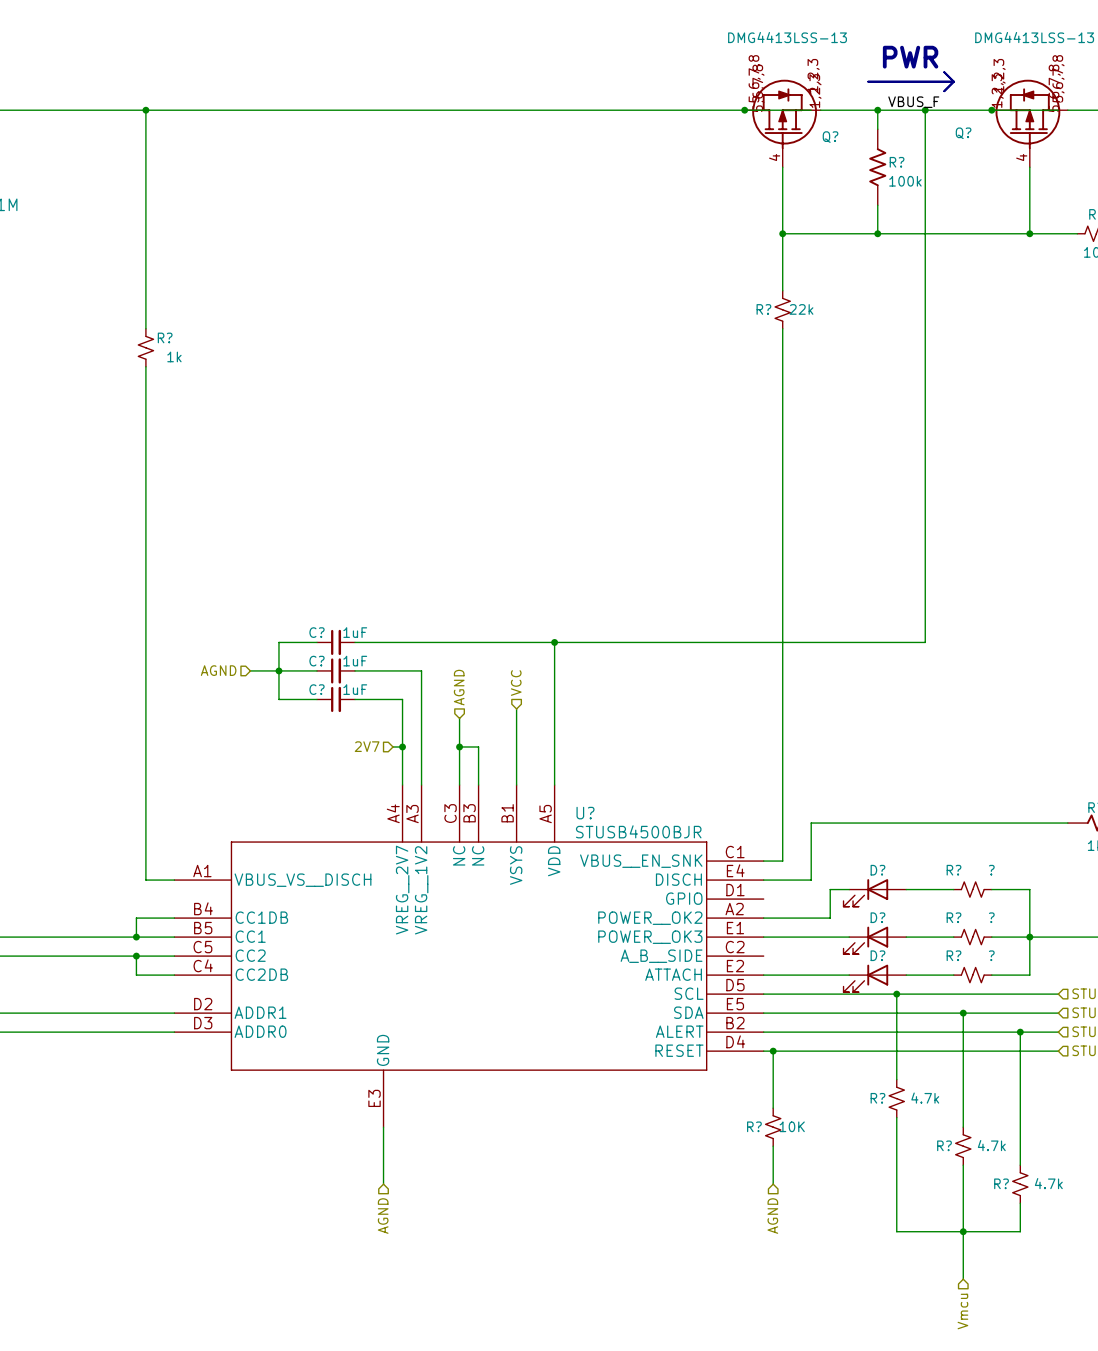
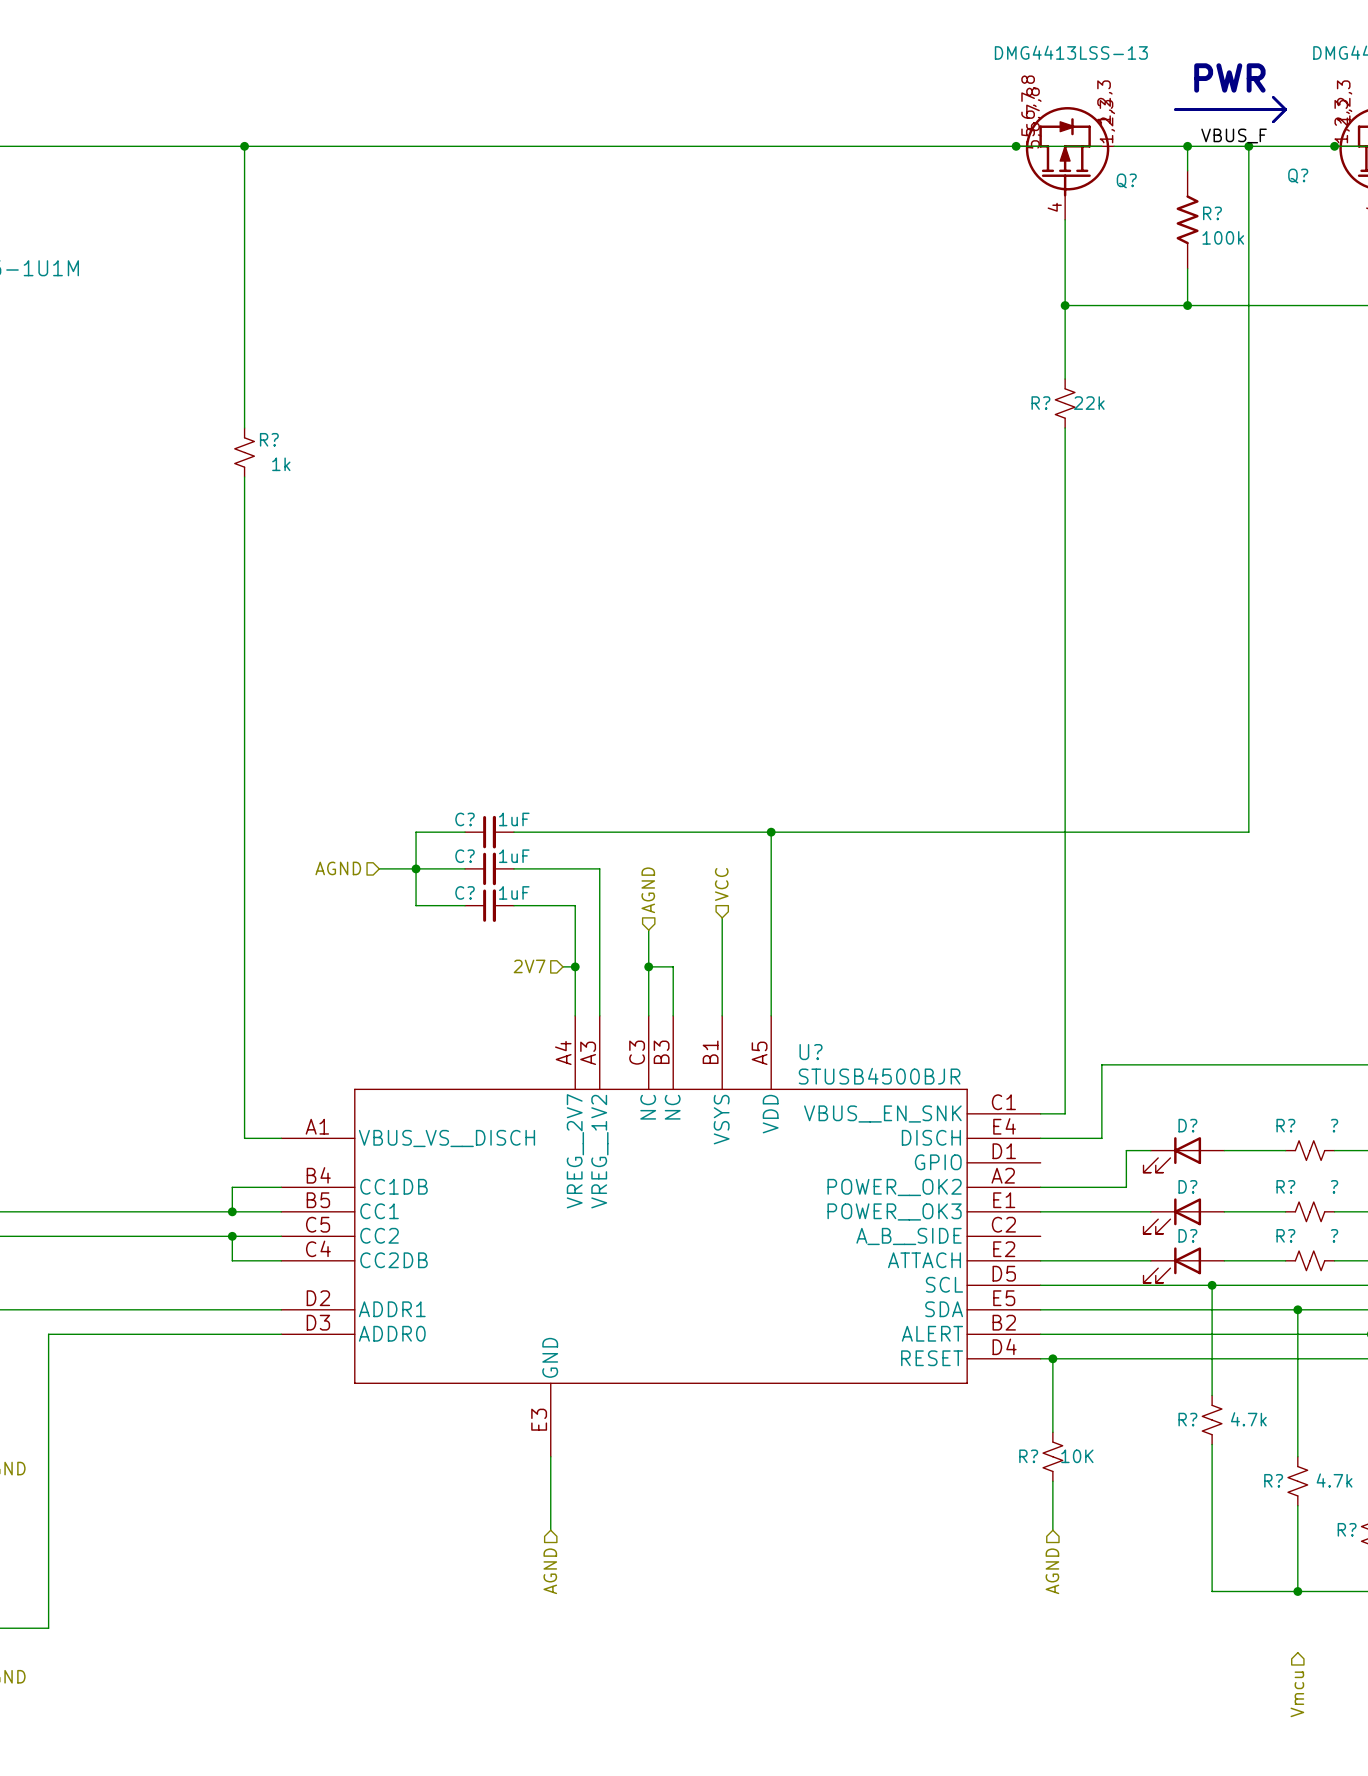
wire: (963, 1231) (963, 1279) -> none

